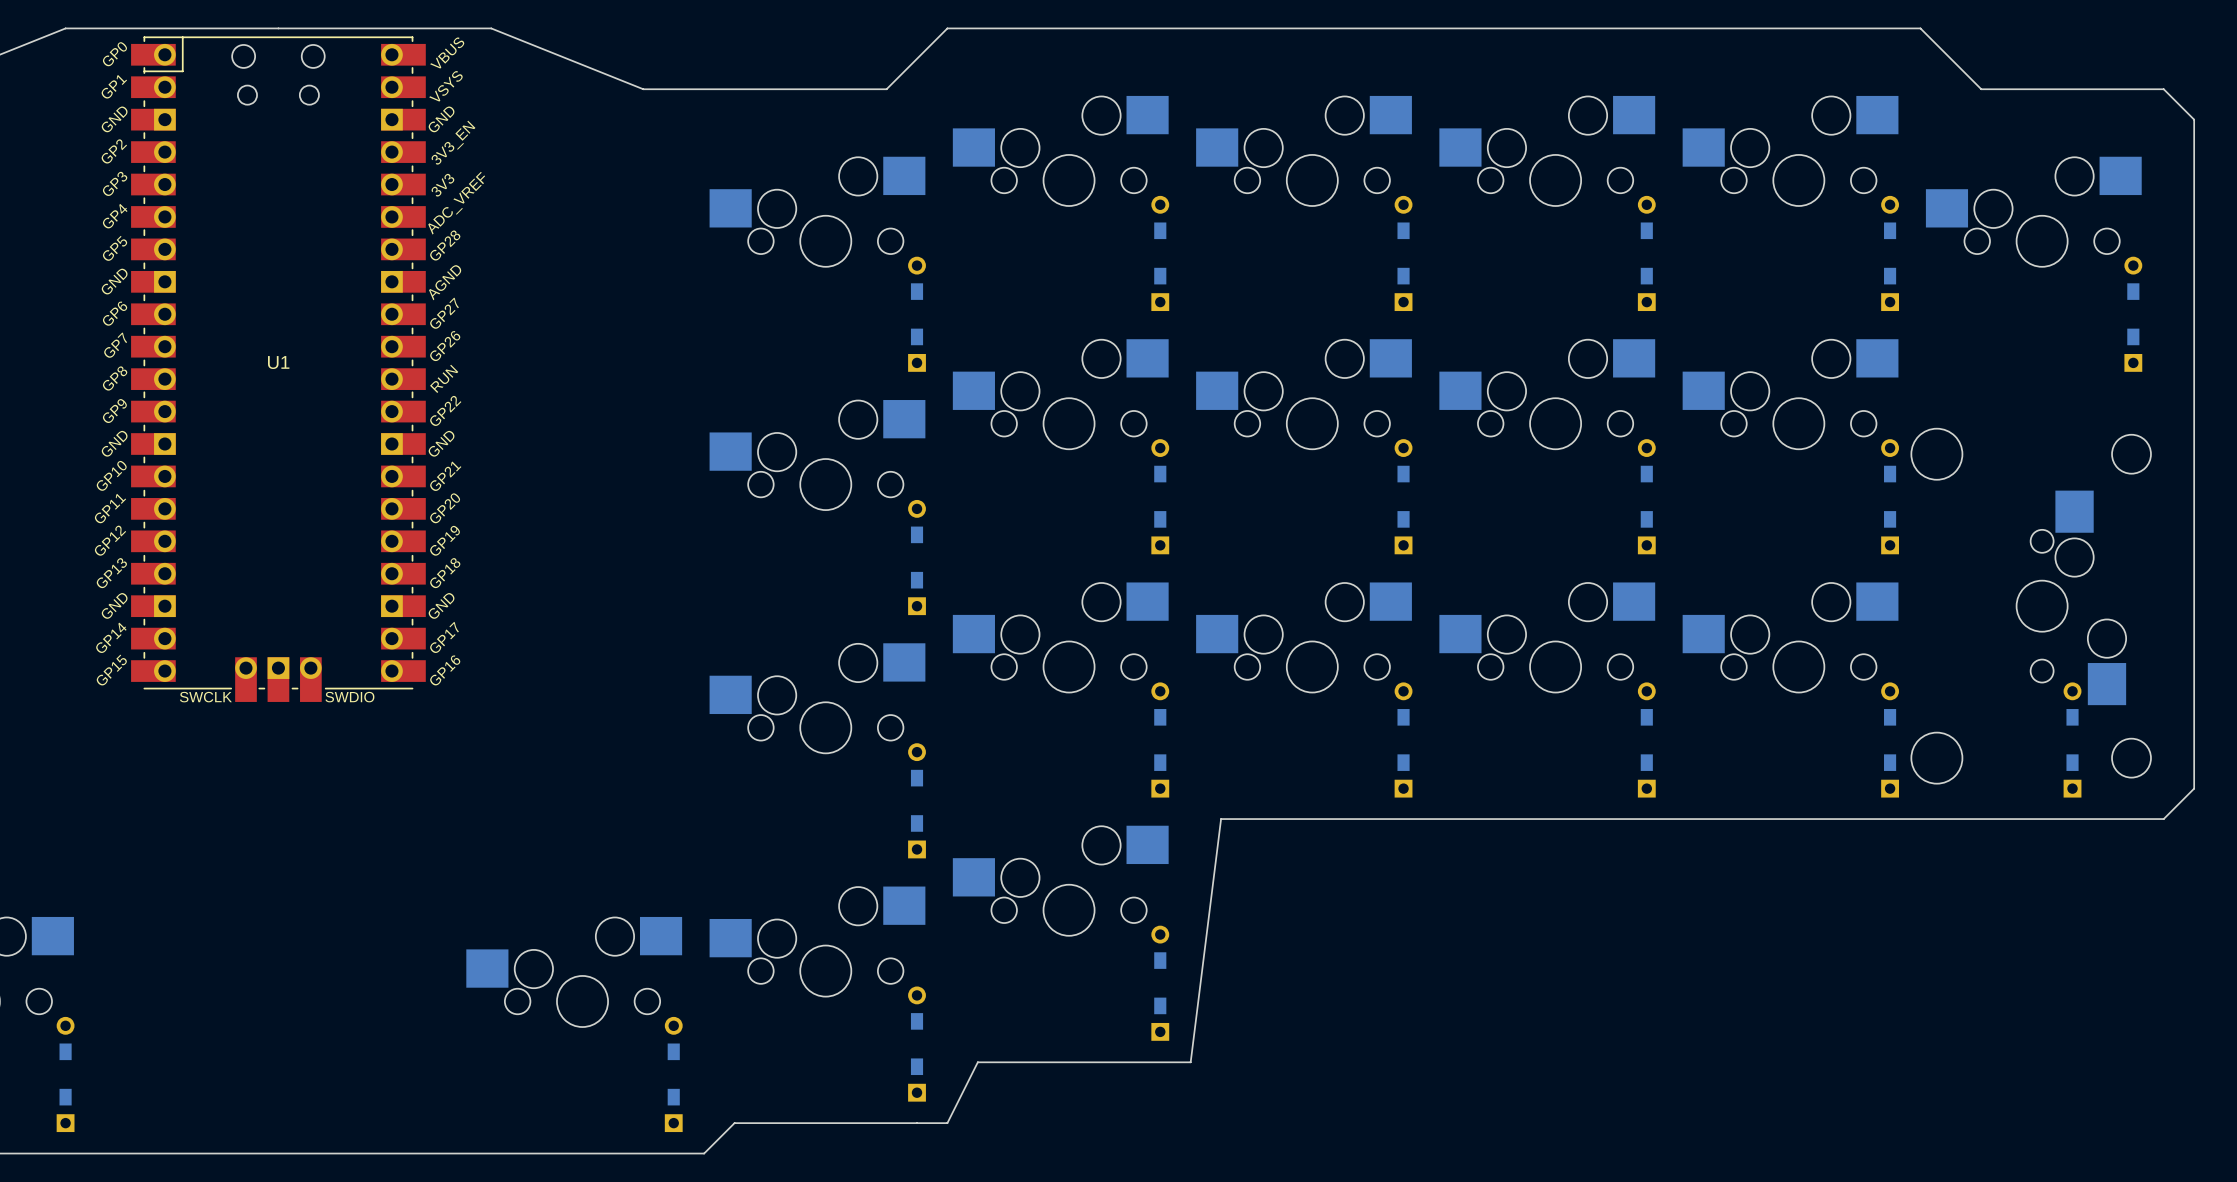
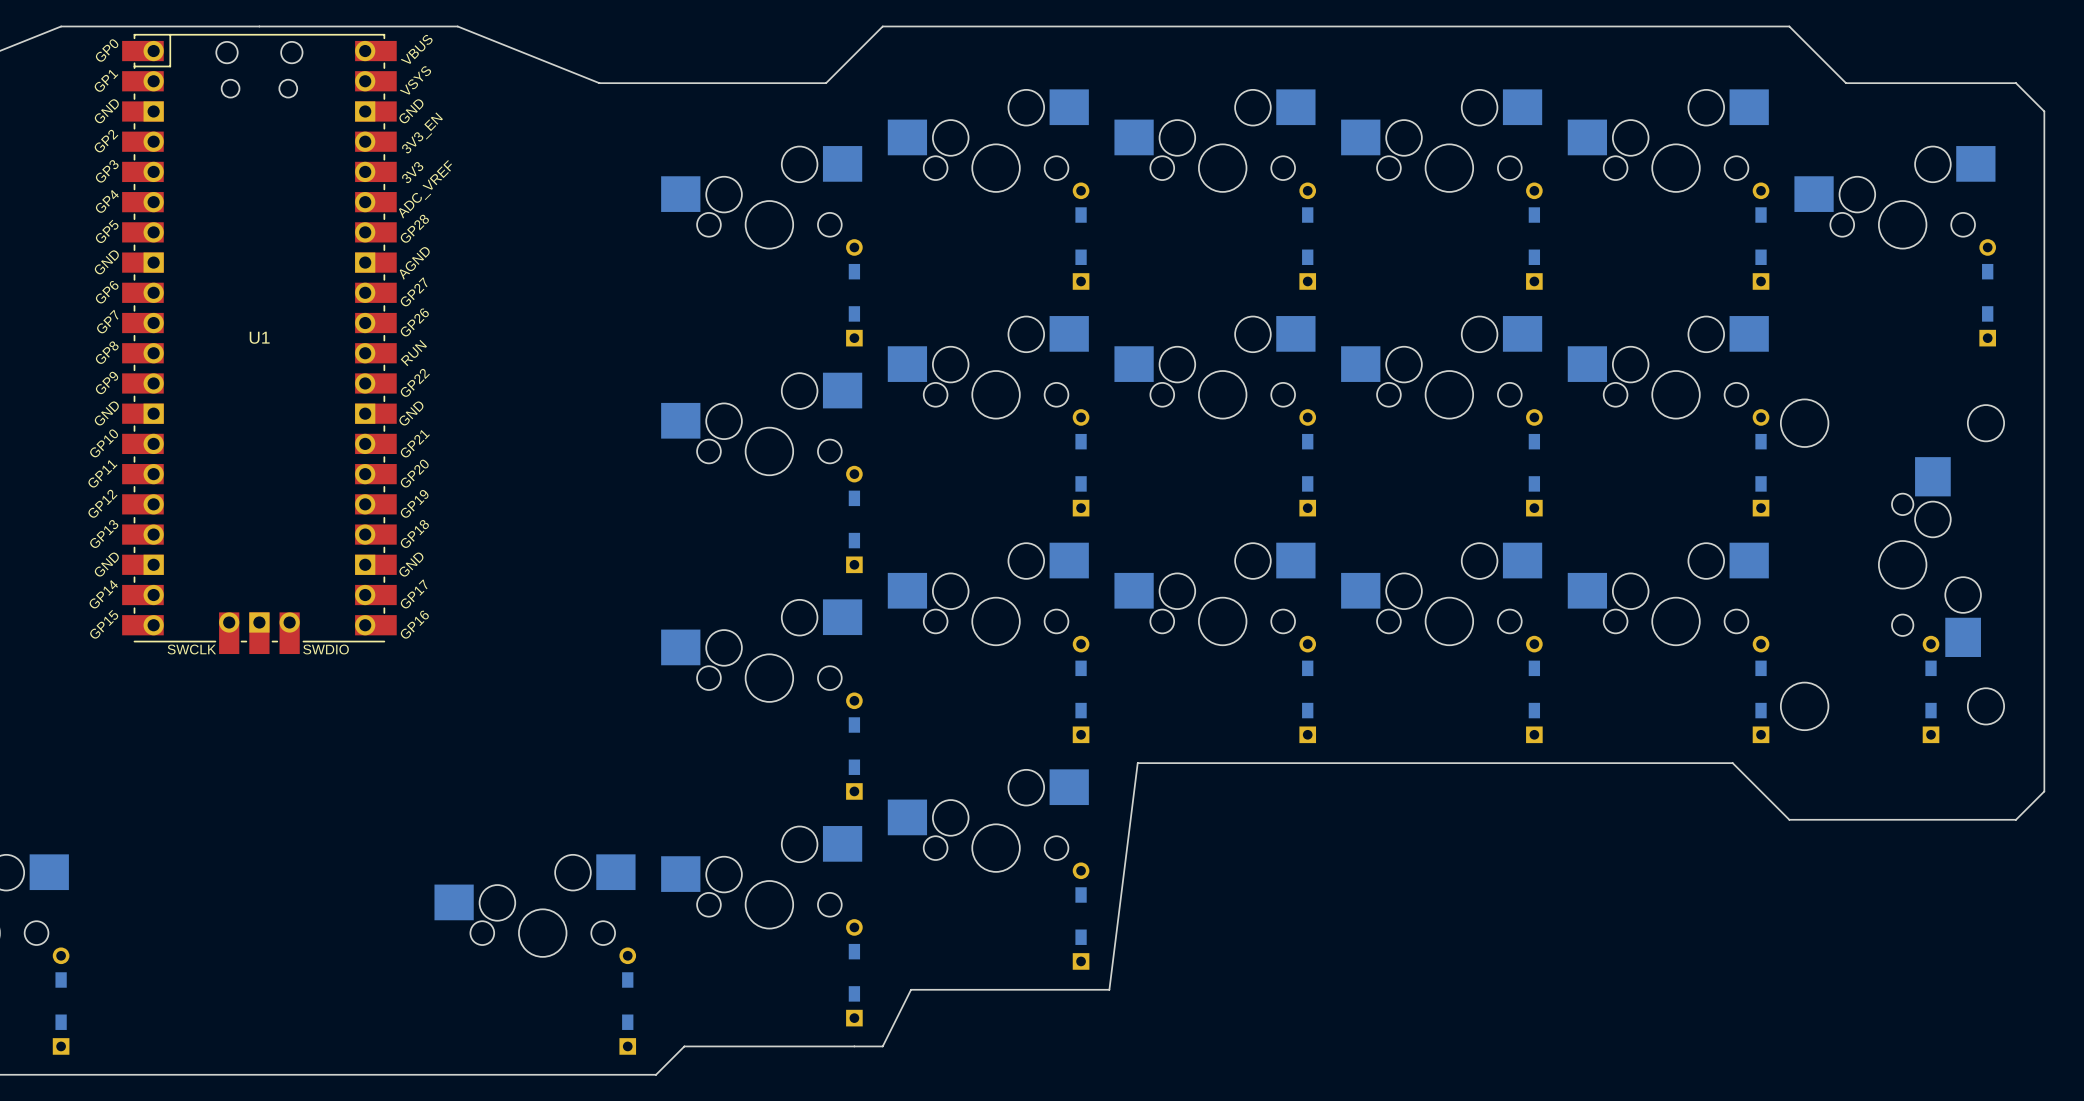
board edge: (2194, 788) (2163, 819) (1859, 819) -> (2044, 734) (2044, 791) (2016, 819) (1789, 819) (1732, 763)

